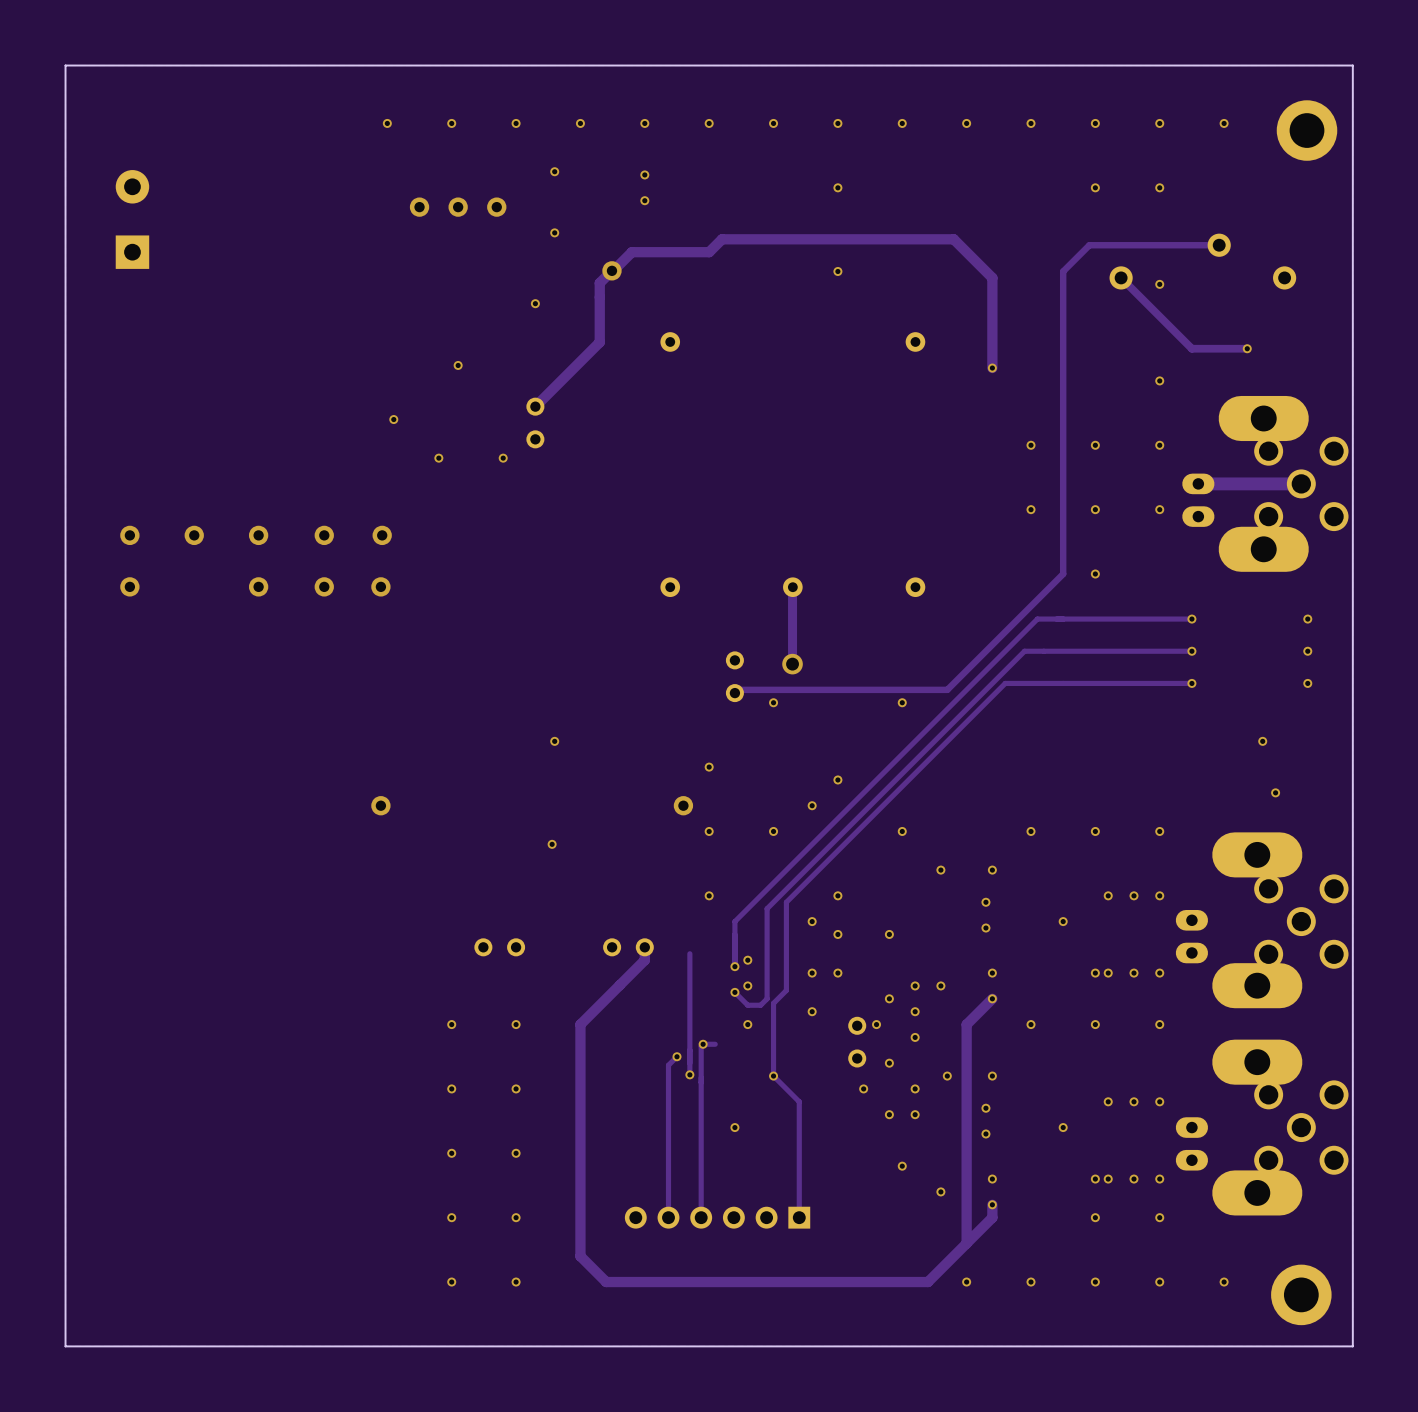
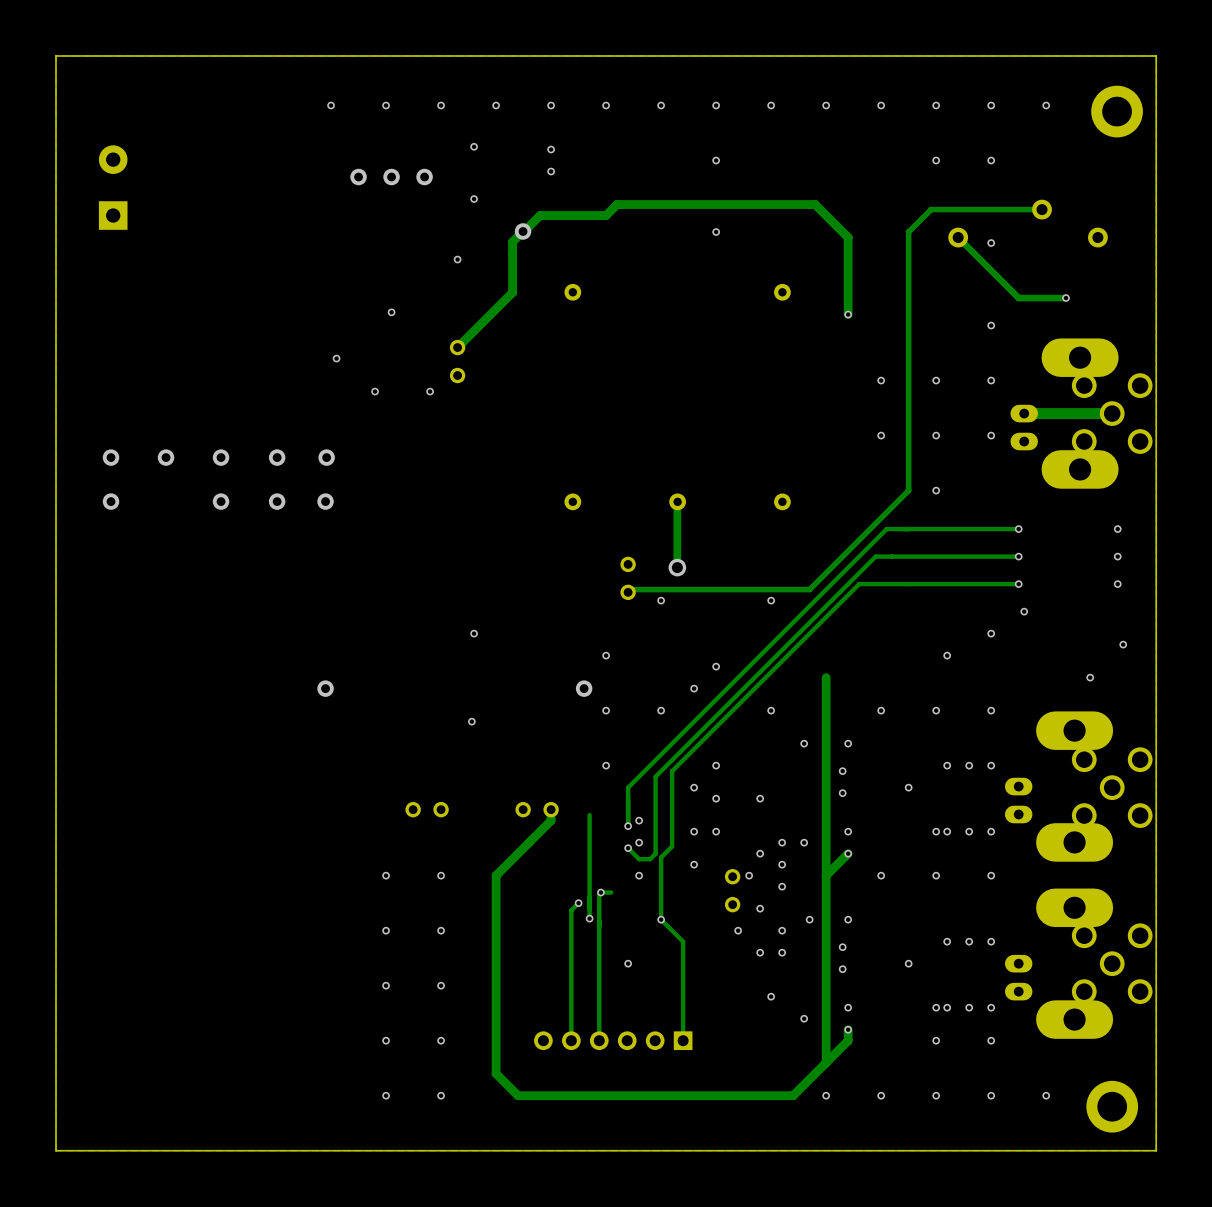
via: none -> (1024, 611)
via: none -> (991, 633)
via: (1262, 741) -> none
via: none -> (1123, 644)
via: none -> (947, 655)
track: none -> (826, 677) (826, 875)

